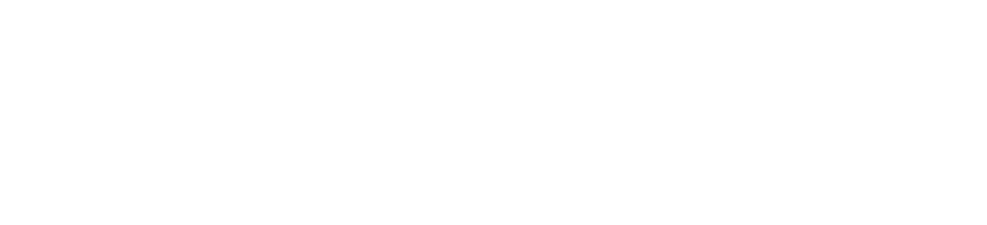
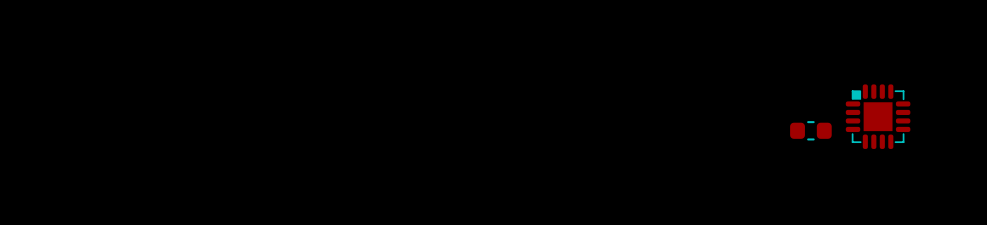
part: none -> (878, 116)
part: none -> (810, 130)

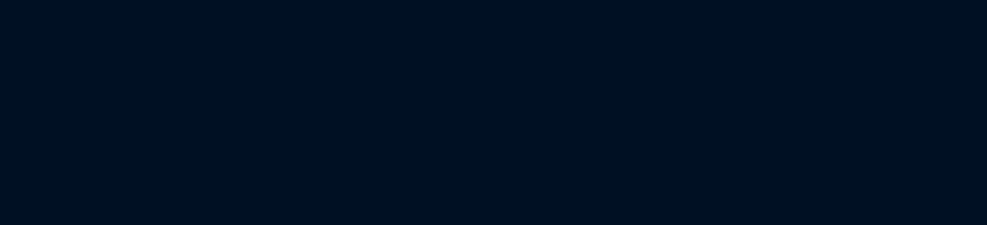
part: (878, 116) -> none
part: (810, 130) -> none

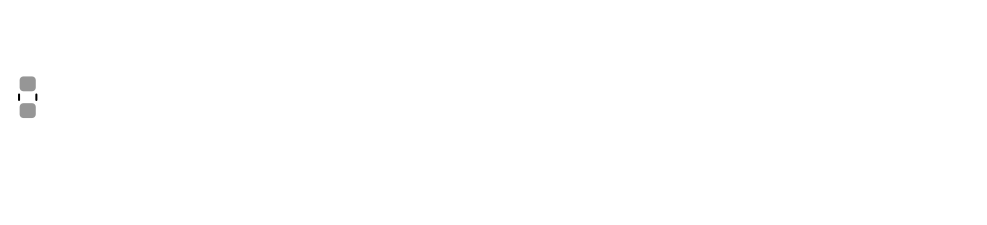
part: none -> (27, 97)

